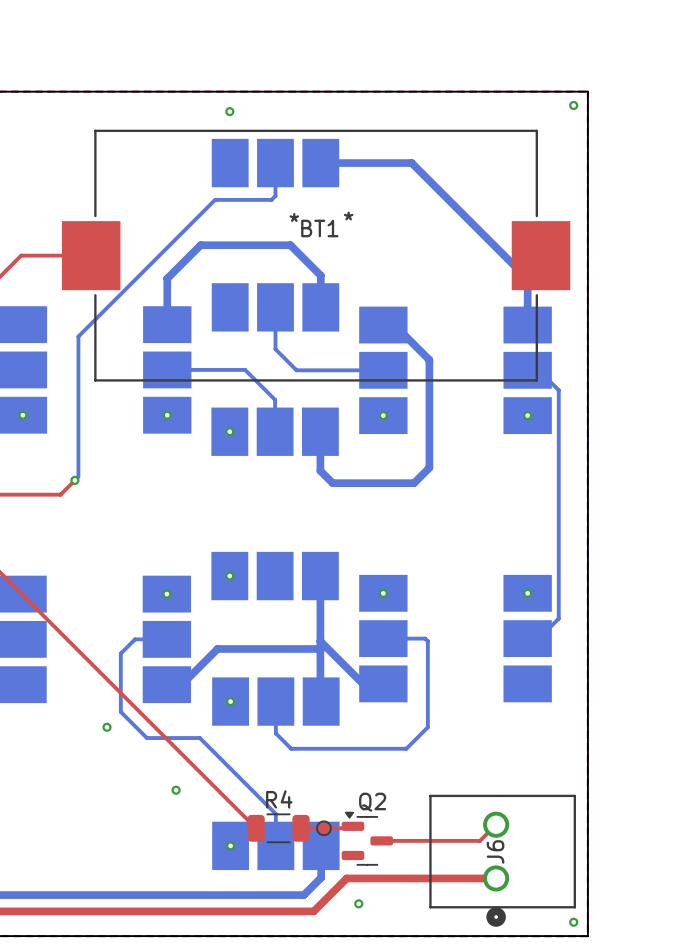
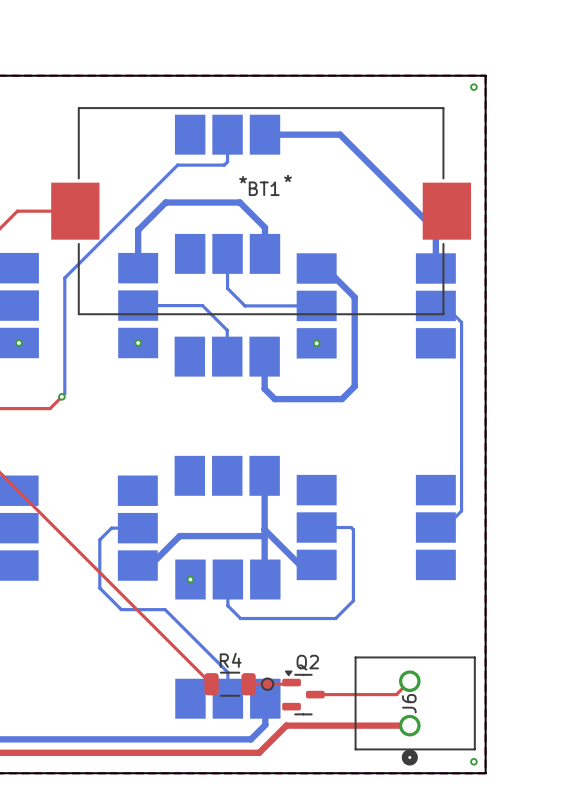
via: (229, 111) -> none
via: (527, 415) -> none
via: (229, 431) -> none
via: (229, 576) -> none
via: (383, 593) -> none
via: (527, 593) -> none
via: (166, 594) -> none
via: (106, 727) -> none
via: (176, 790) -> none
via: (230, 845) -> none
via: (358, 903) -> none

